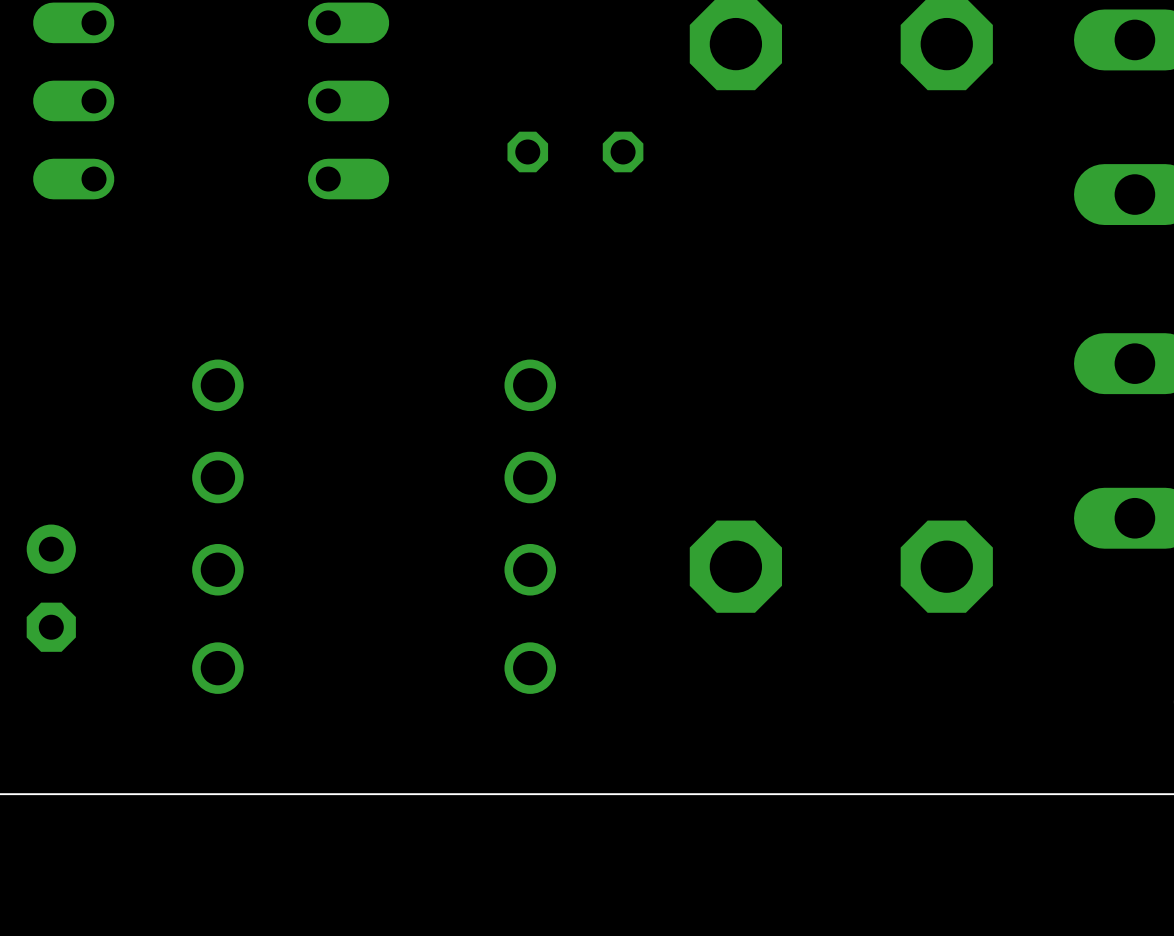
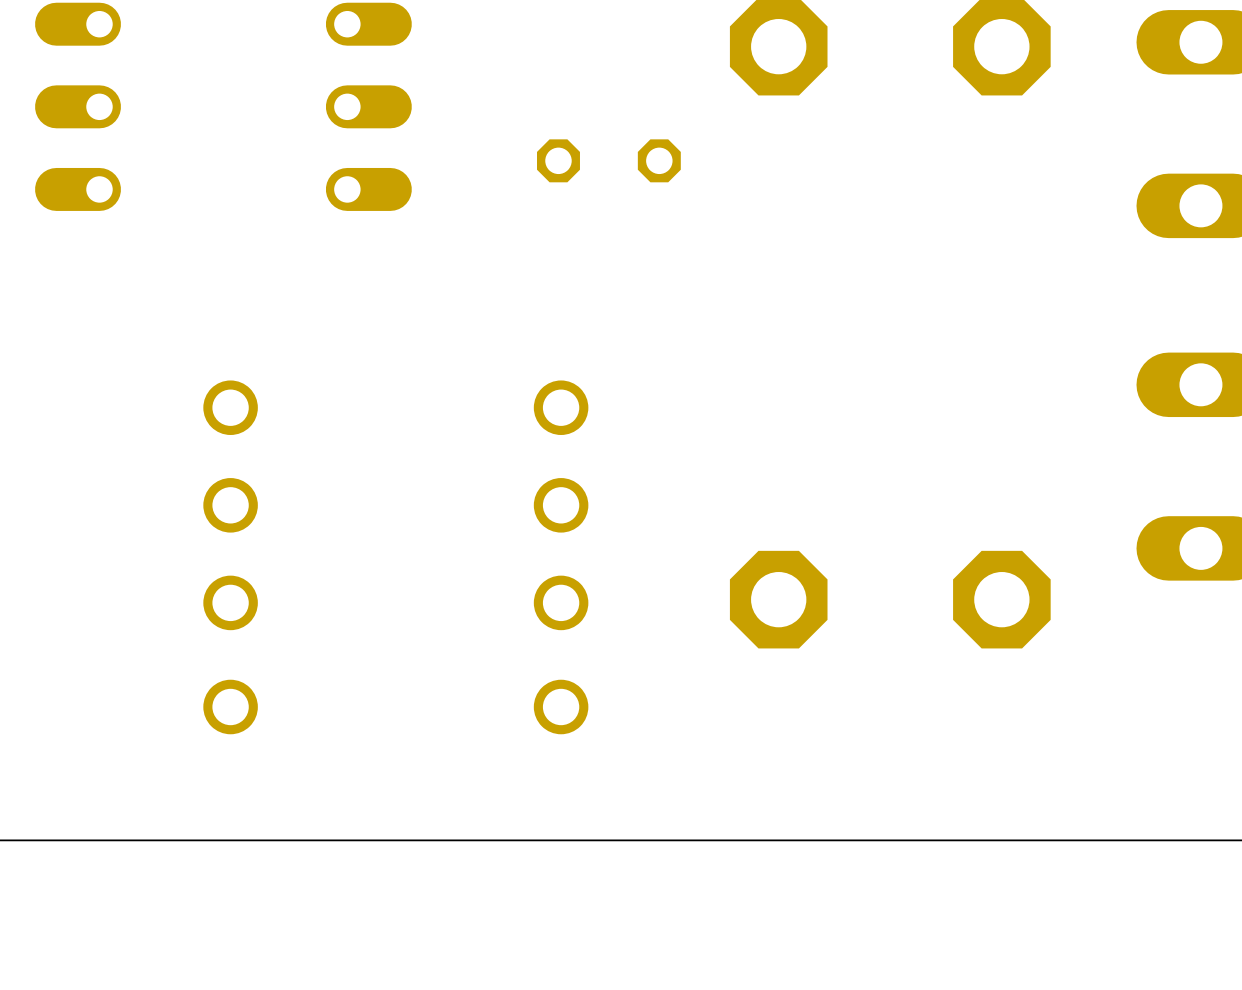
part: (51, 588) -> none

